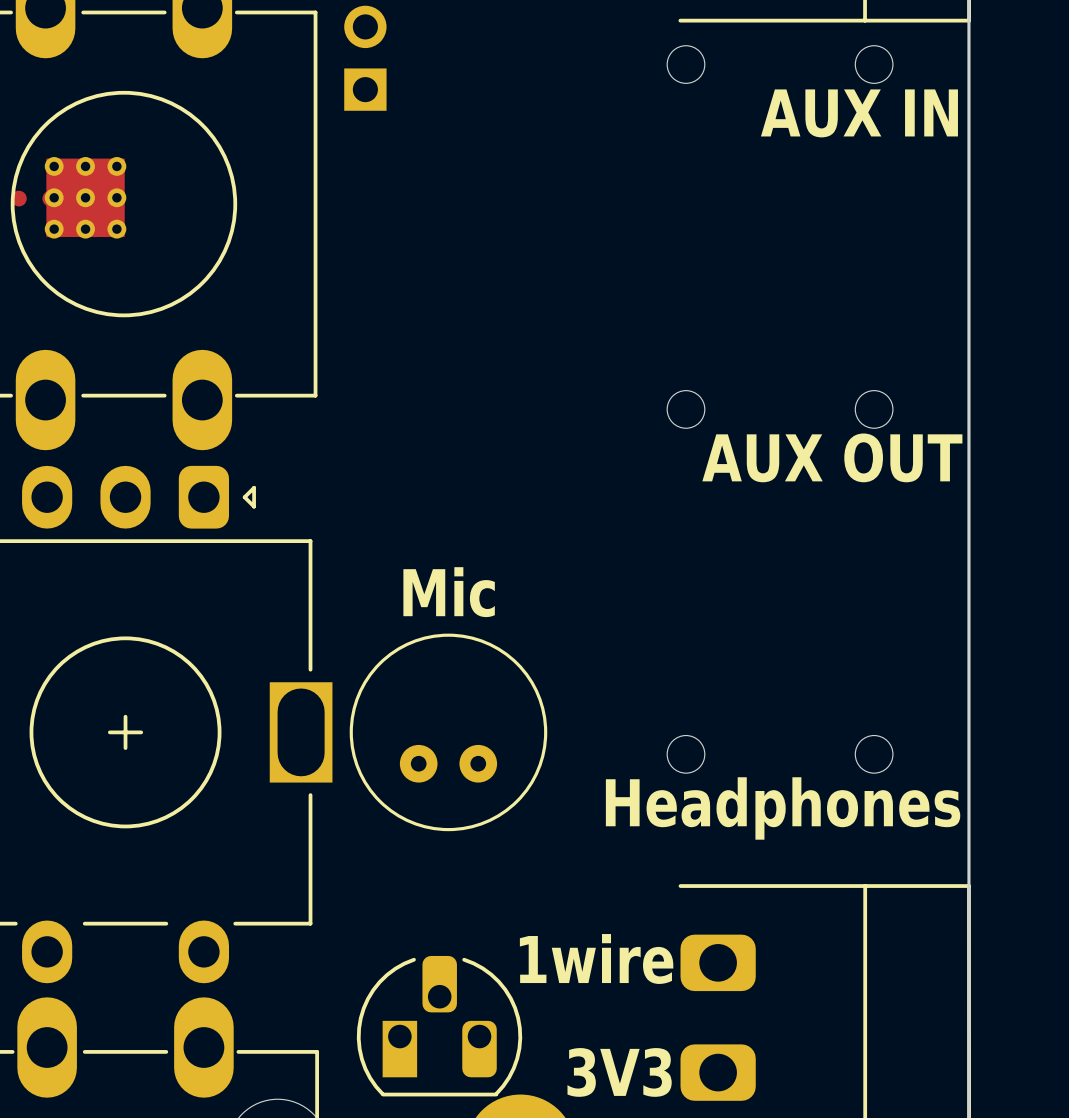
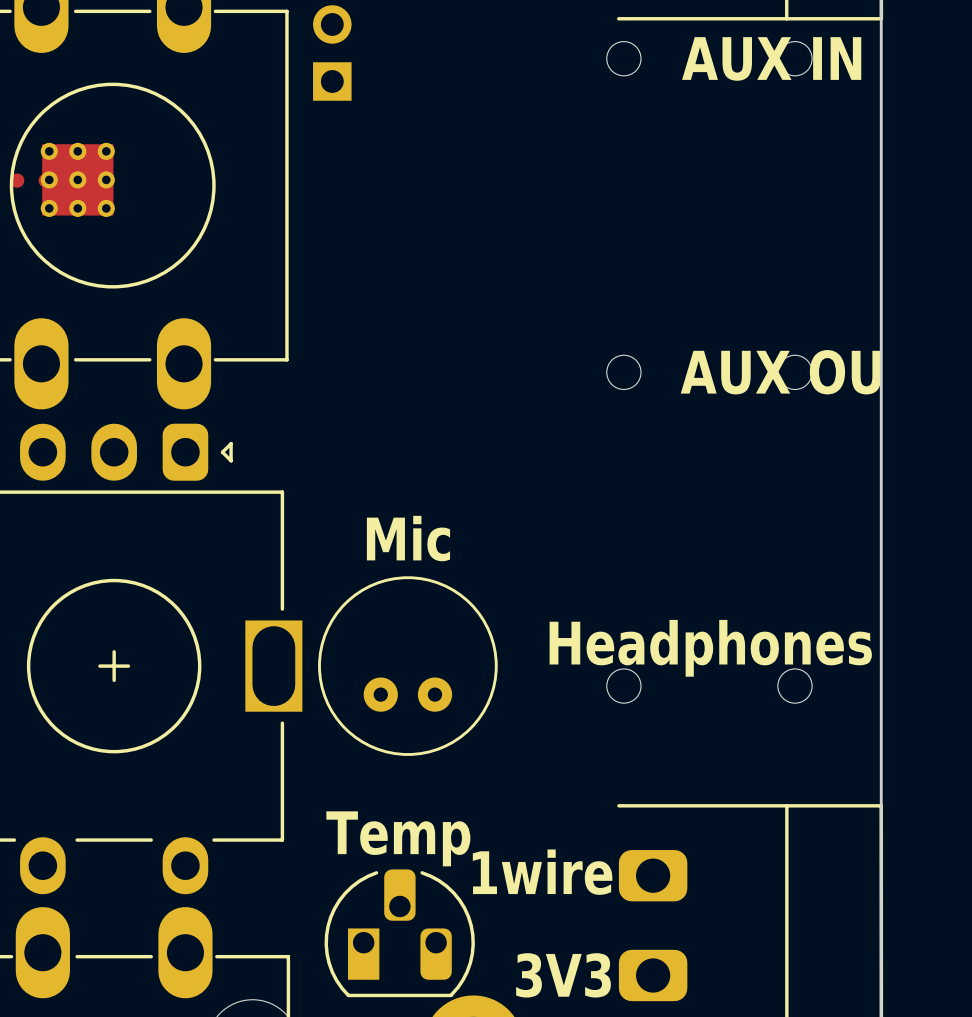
text position: AUX IN (859, 113) -> AUX IN (771, 58)
text: AUX OUT (832, 457) -> AUX OU (781, 372)
text position: Headphones (783, 808) -> Headphones (710, 648)
text: none -> Temp (398, 838)

